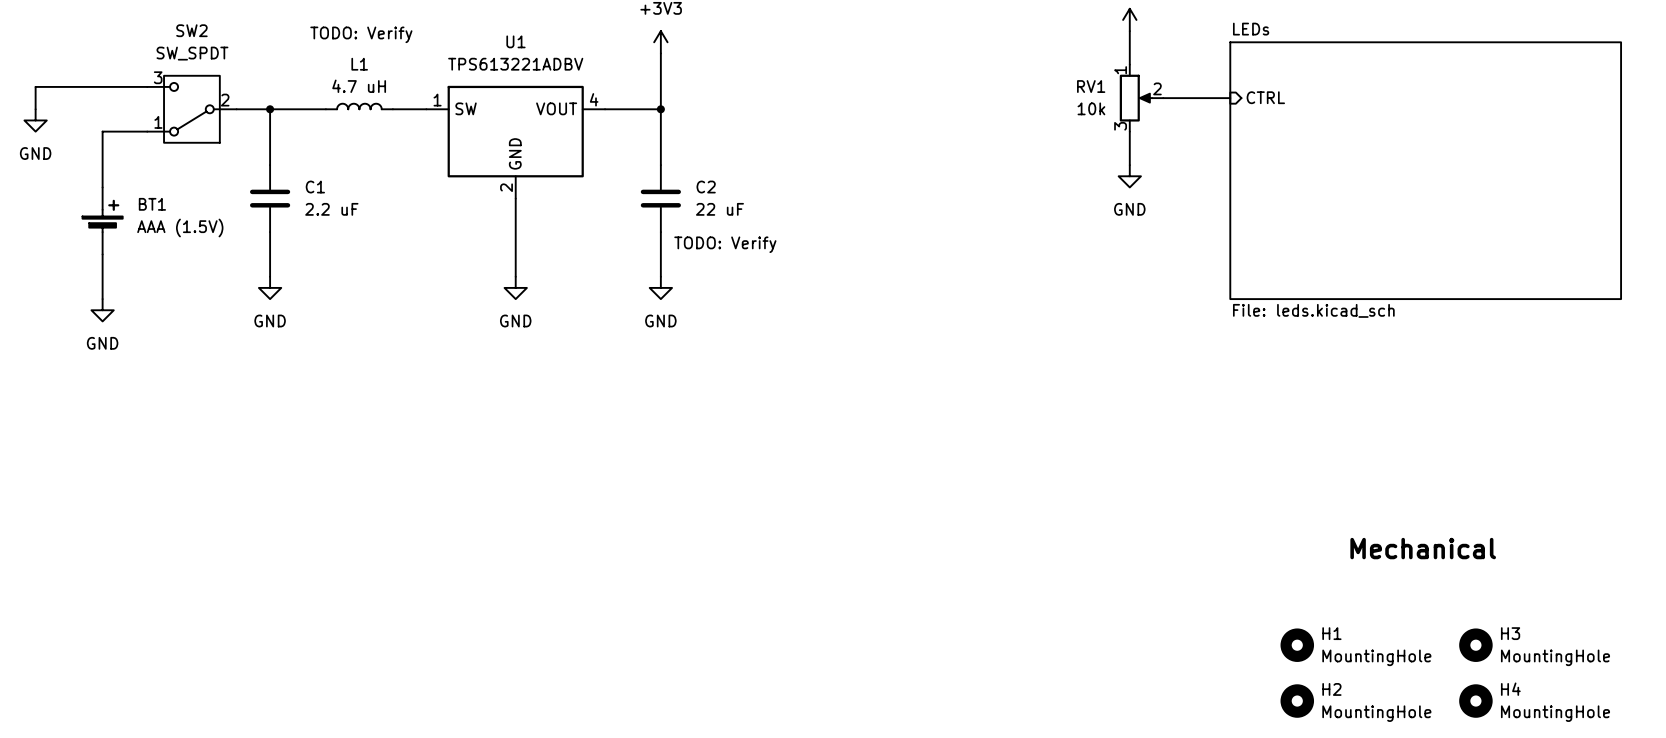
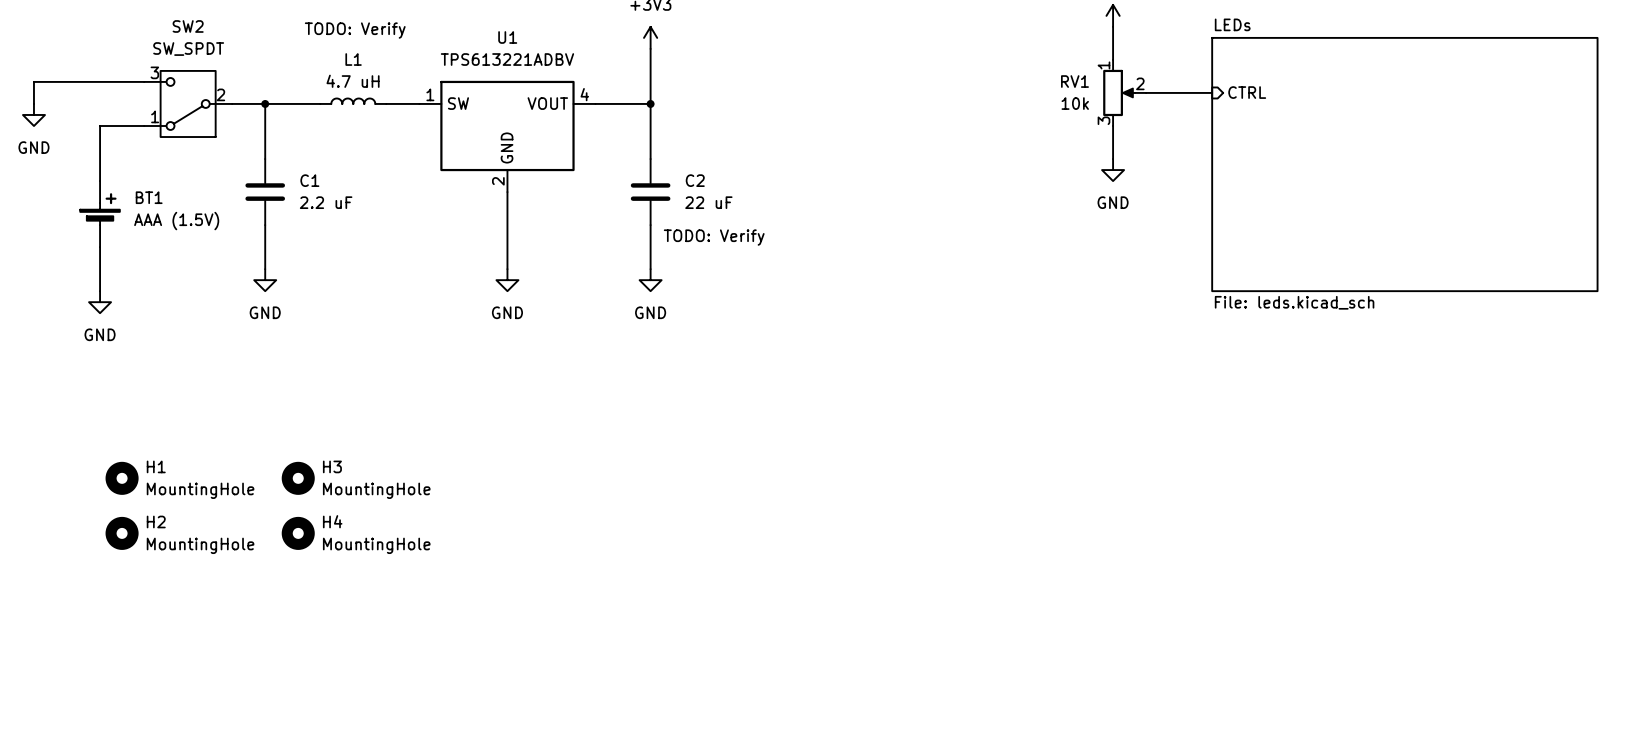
text: Mechanical (1423, 548) -> none
H1 position: (1297, 645) -> (122, 478)
H3 position: (1475, 645) -> (298, 478)
H2 position: (1297, 701) -> (122, 533)
H4 position: (1475, 701) -> (298, 533)

